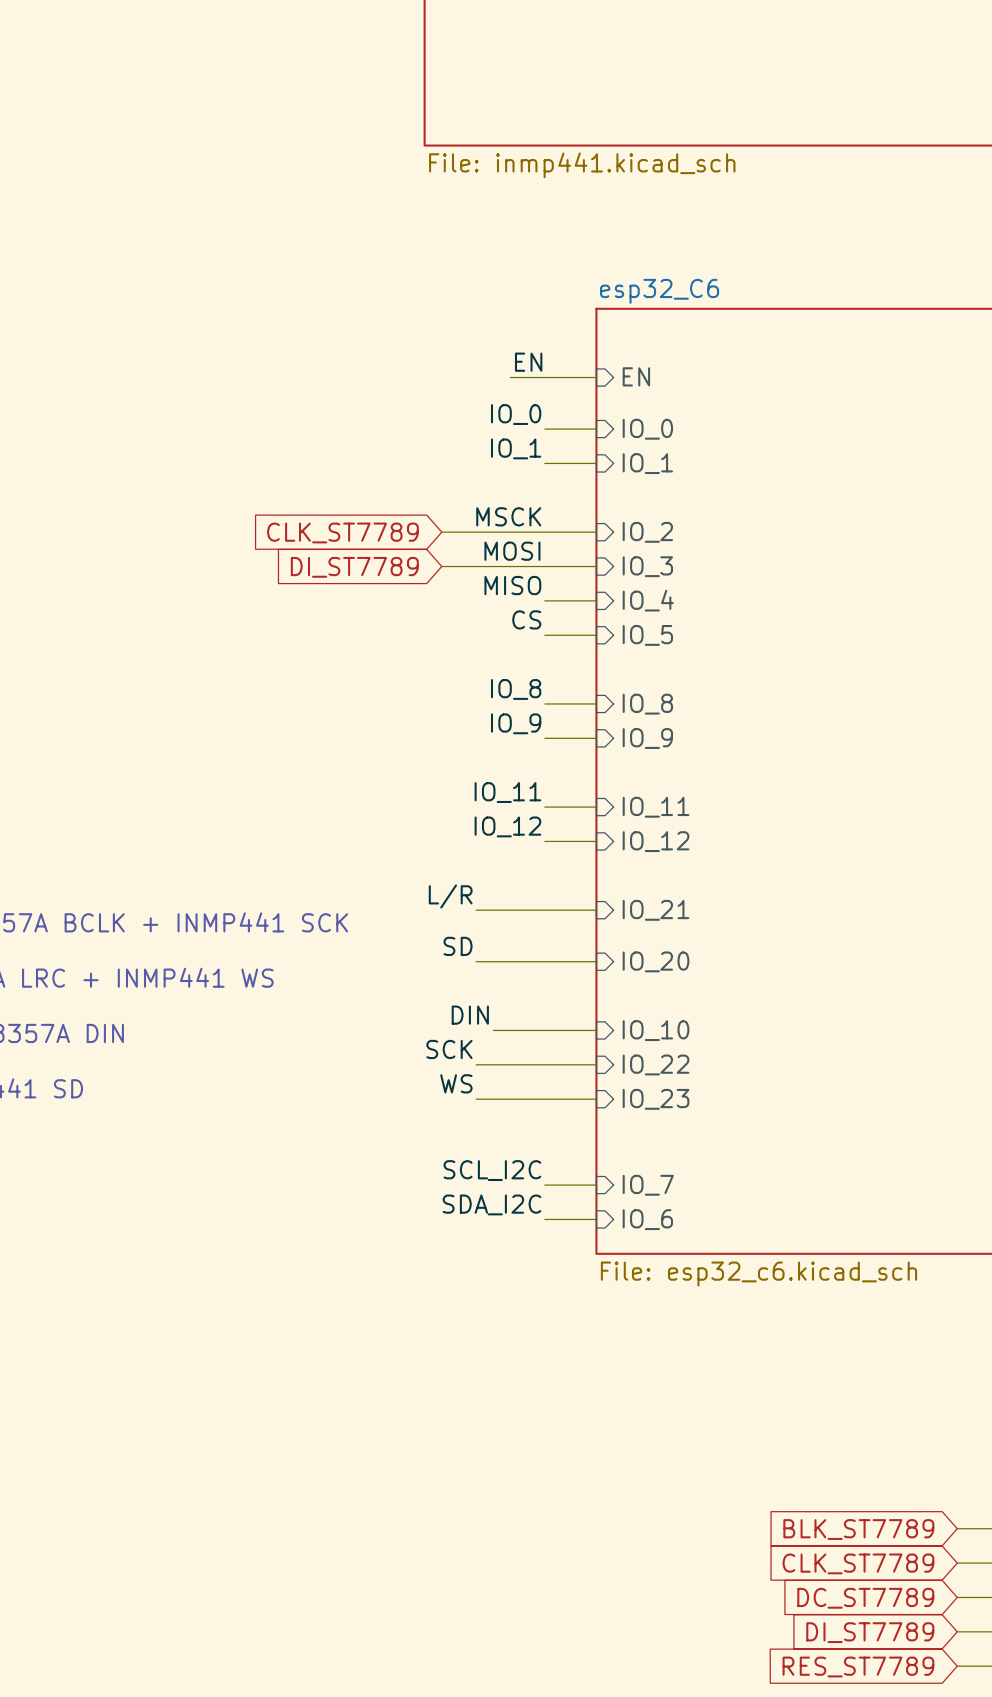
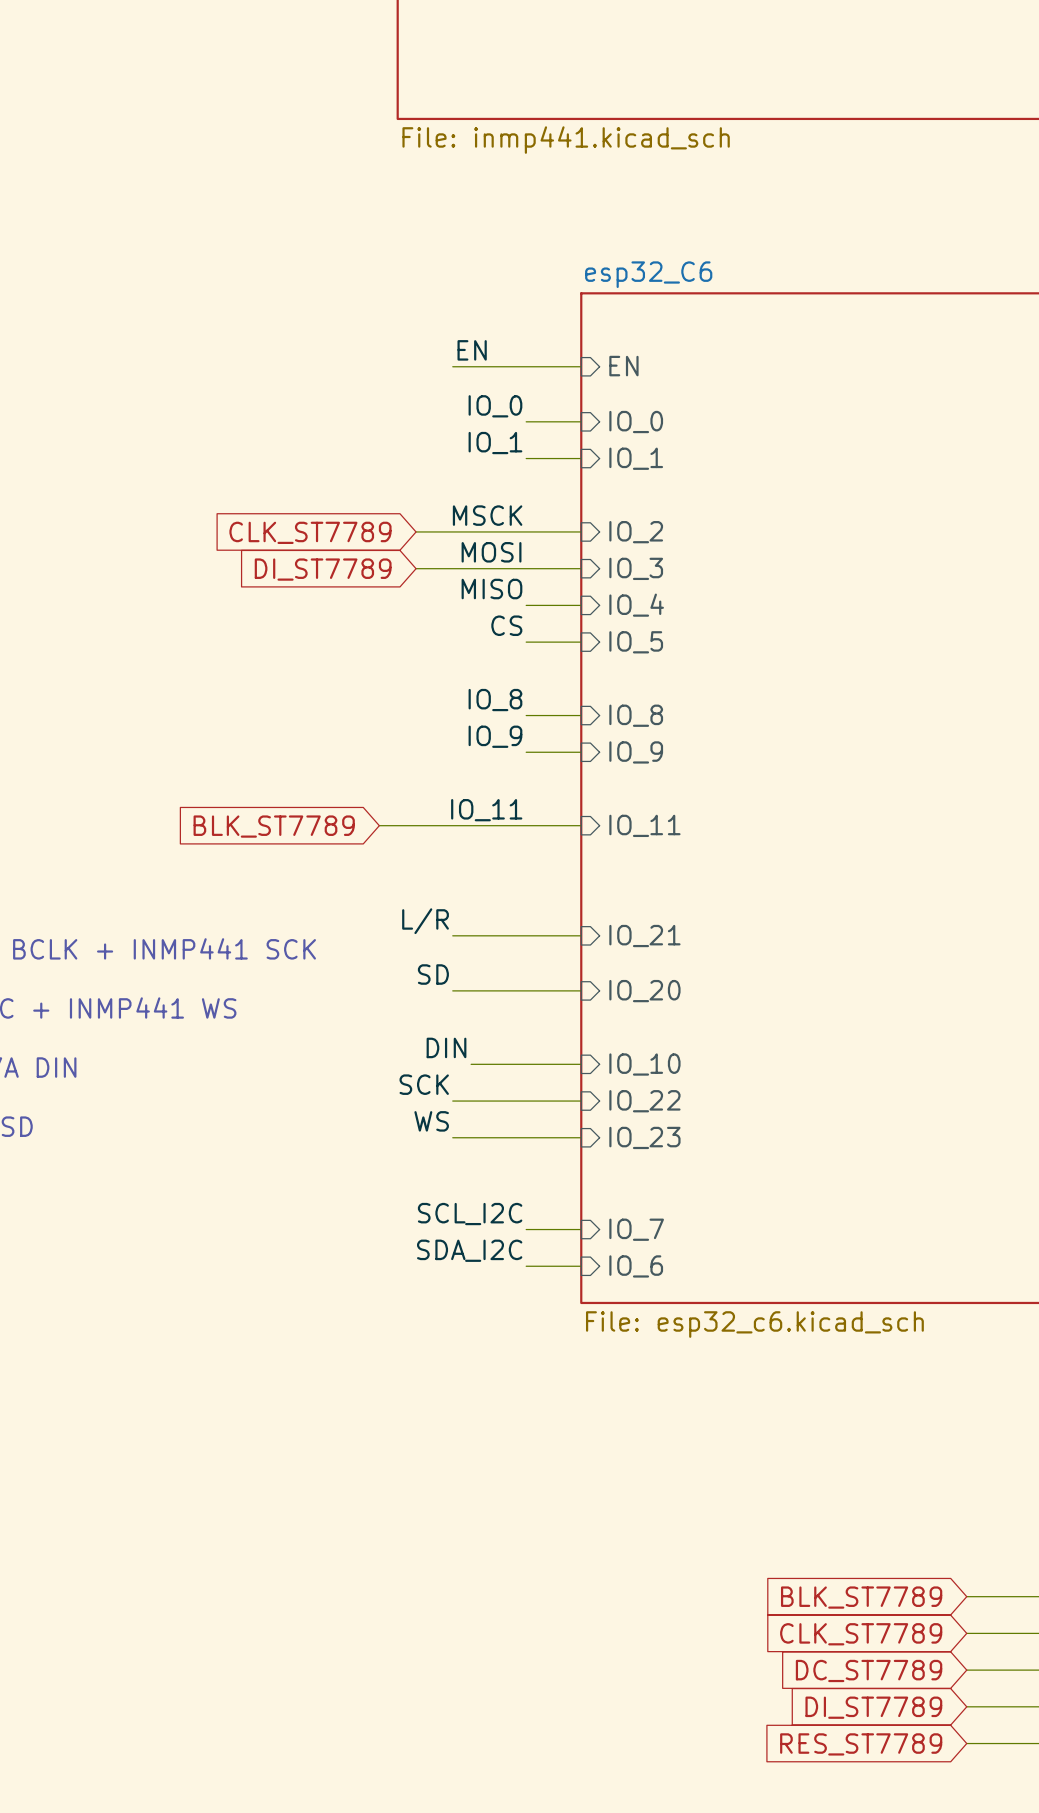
label position: EN (528, 362) -> EN (472, 350)
wire: none -> (452, 366) (489, 366)
global label: none -> BLK_ST7789 (274, 826)
wire: none -> (379, 825) (526, 825)
label: IO_12 (507, 826) -> none
wire: (544, 841) (596, 841) -> none
sheet pin: IO_12 (656, 841) -> none

